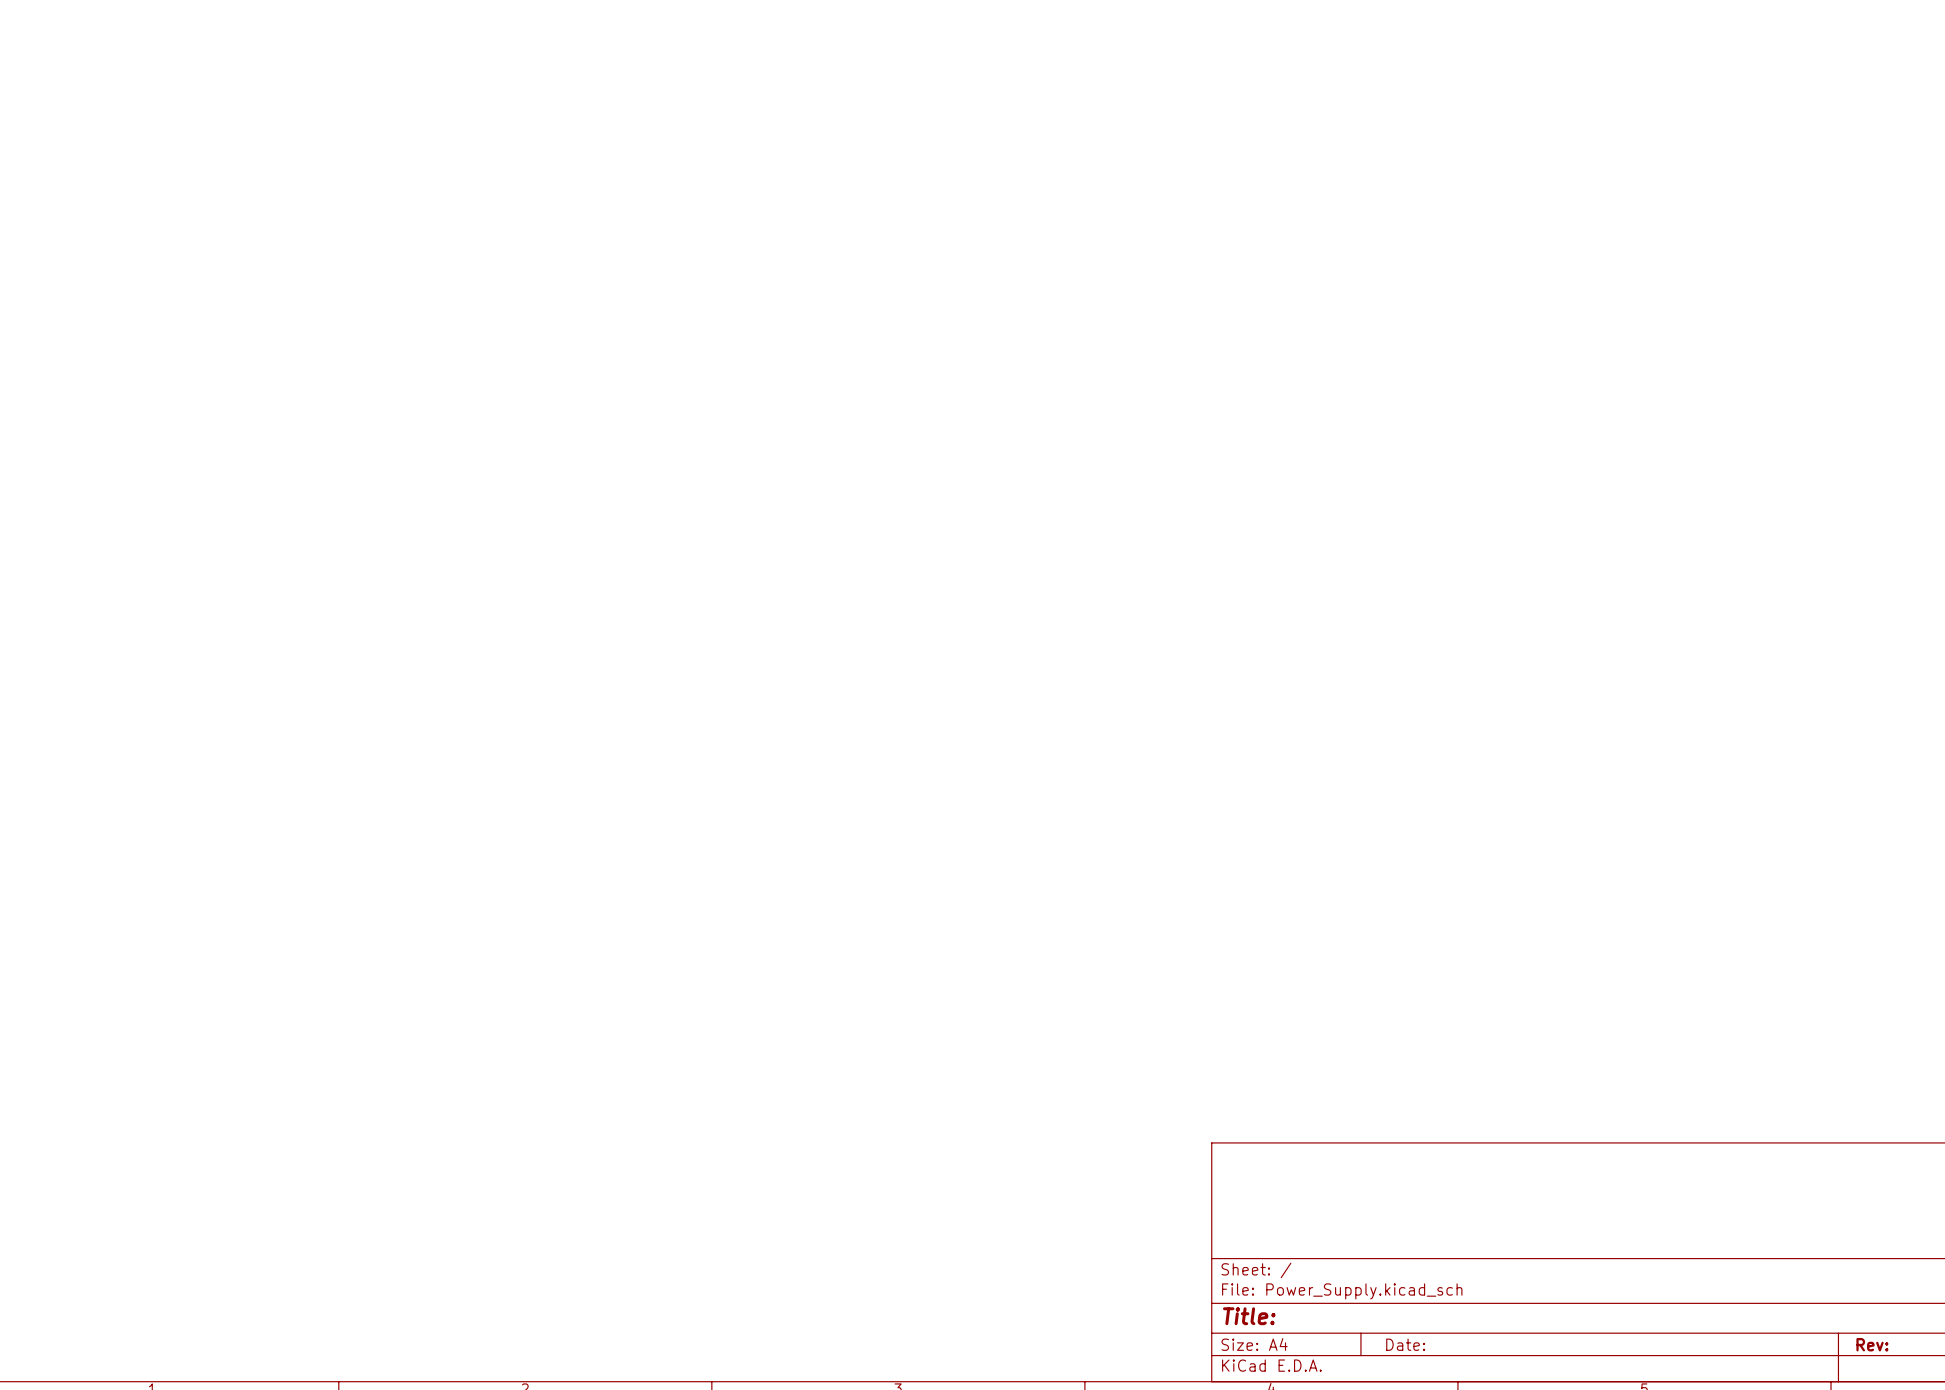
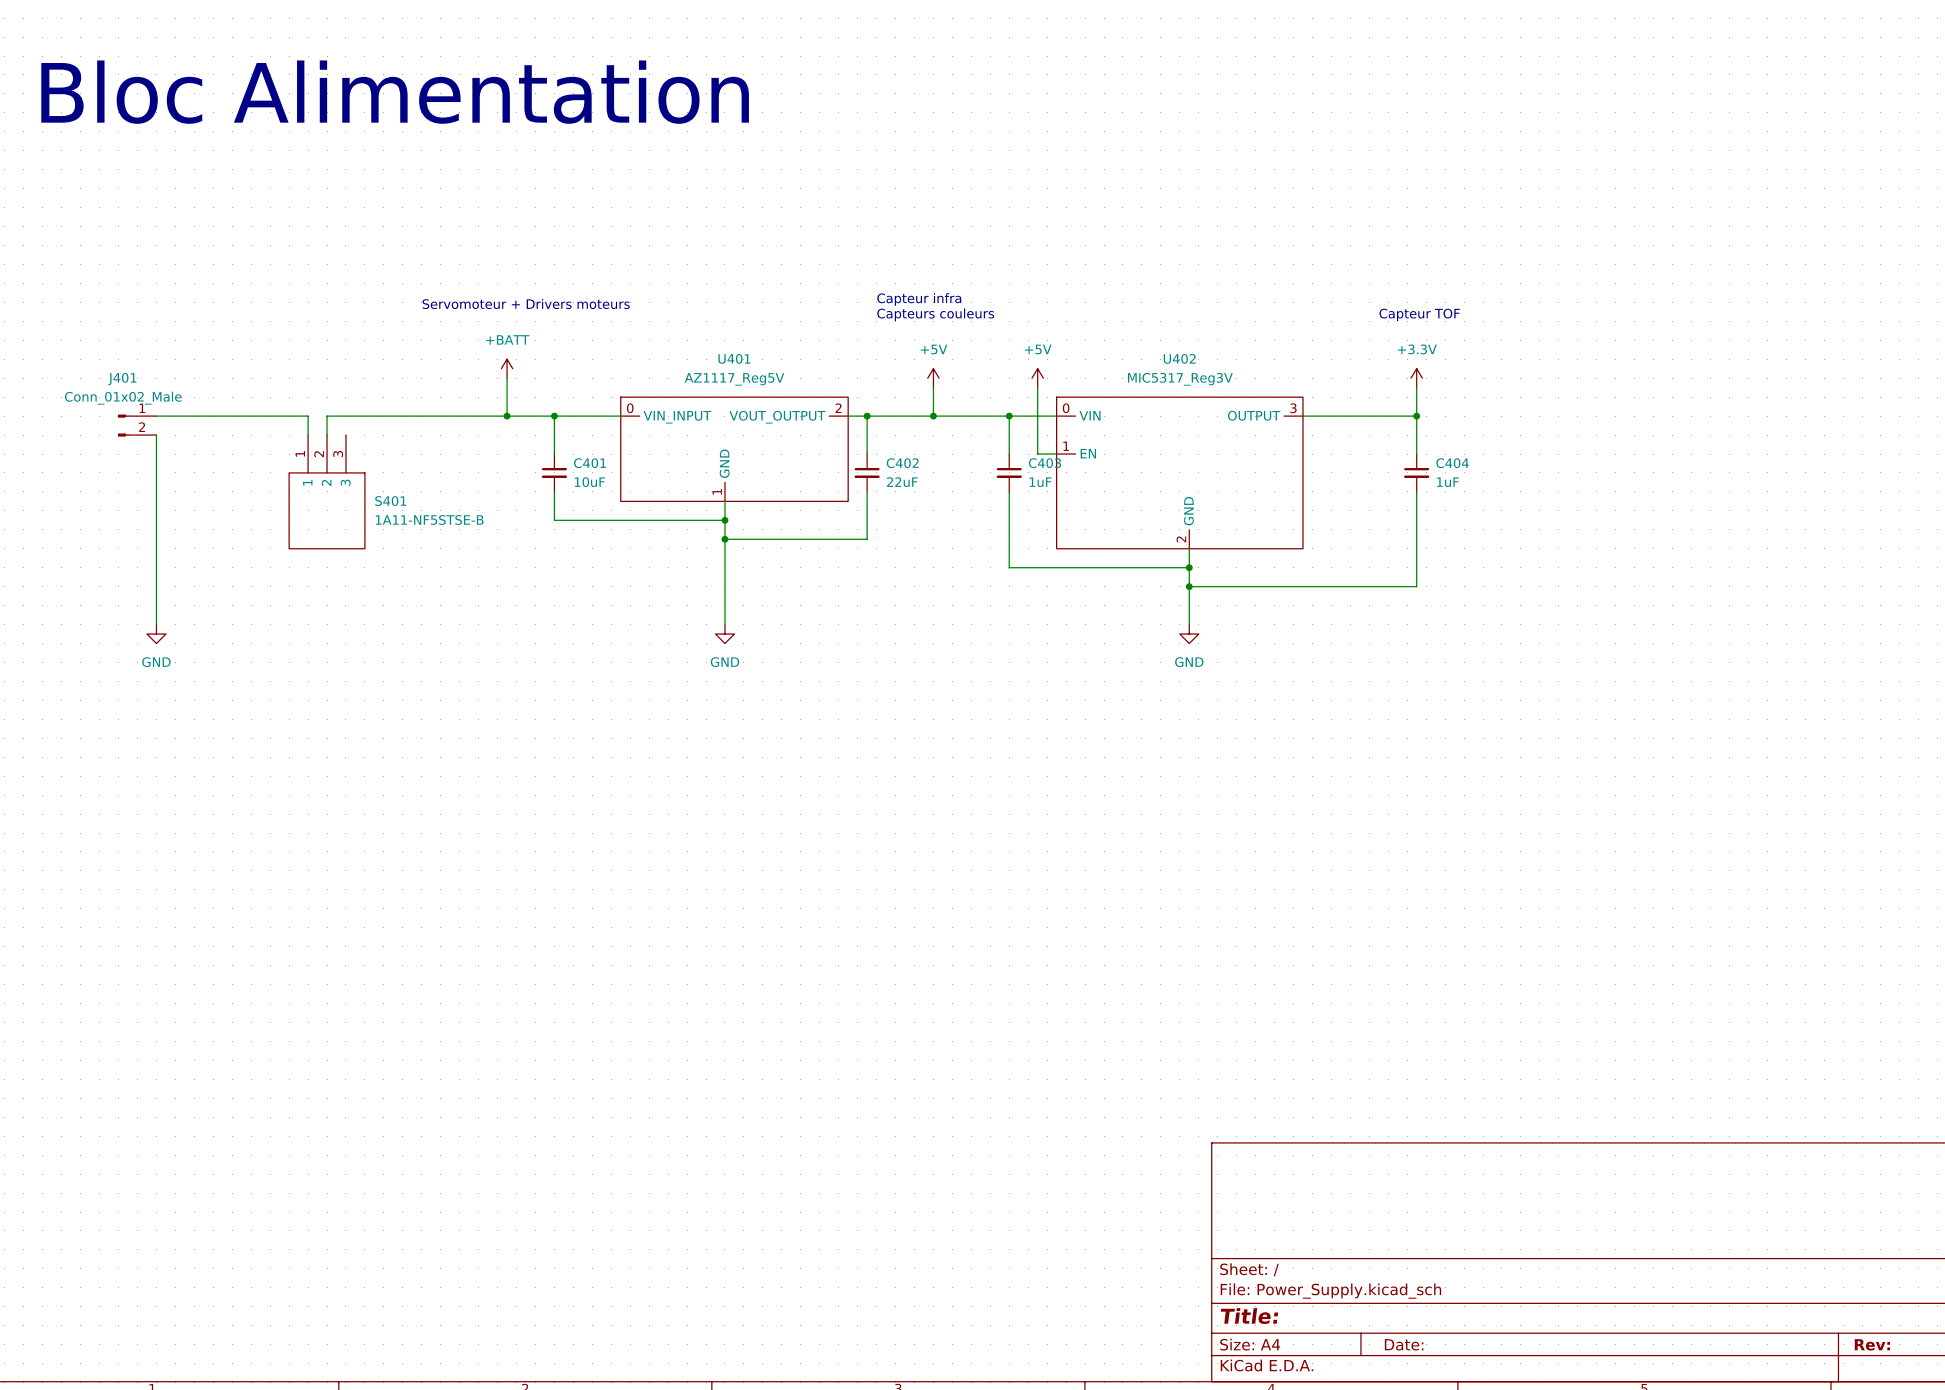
text: none -> Bloc Alimentation (395, 92)
text: none -> Capteur infra (919, 299)
text: none -> Servomoteur + Drivers moteurs (526, 304)
text: none -> Capteurs couleurs (935, 314)
text: none -> Capteur TOF (1419, 314)
power symbol: none -> +BATT (507, 368)
wire: none -> (507, 378) (507, 416)
power symbol: none -> +5V (933, 378)
power symbol: none -> +5V (1037, 378)
power symbol: none -> +3.3V (1416, 378)
wire: none -> (933, 387) (933, 416)
wire: none -> (1037, 387) (1037, 454) (1056, 454)
wire: none -> (1416, 387) (1416, 454)
wire: none -> (156, 416) (308, 416) (308, 435)
junction: none -> (507, 416)
wire: none -> (554, 416) (554, 454)
junction: none -> (554, 416)
wire: none -> (620, 416) (327, 416) (327, 435)
wire: none -> (848, 416) (1056, 416)
wire: none -> (867, 416) (867, 454)
junction: none -> (867, 416)
junction: none -> (933, 416)
wire: none -> (1009, 416) (1009, 454)
junction: none -> (1009, 416)
wire: none -> (1302, 416) (1416, 416)
junction: none -> (1416, 416)
J401: none -> Conn_01x02_Male (137, 425)
wire: none -> (156, 435) (156, 624)
U401: none -> AZ1117_Reg5V (734, 449)
C401: none -> 10uF (554, 472)
C402: none -> 22uF (867, 472)
C403: none -> 1uF (1009, 472)
U402: none -> MIC5317_Reg3V (1179, 472)
C404: none -> 1uF (1416, 472)
wire: none -> (554, 491) (554, 520) (724, 520)
wire: none -> (867, 491) (867, 539) (724, 539)
wire: none -> (1009, 491) (1009, 567) (1189, 567)
wire: none -> (1416, 491) (1416, 586) (1189, 586)
S401: none -> 1A11-NF5STSE-B (327, 492)
wire: none -> (724, 501) (724, 624)
junction: none -> (724, 520)
junction: none -> (724, 539)
wire: none -> (1189, 548) (1189, 624)
junction: none -> (1189, 567)
junction: none -> (1189, 586)
power symbol: none -> GND (156, 634)
power symbol: none -> GND (724, 634)
power symbol: none -> GND (1189, 634)

